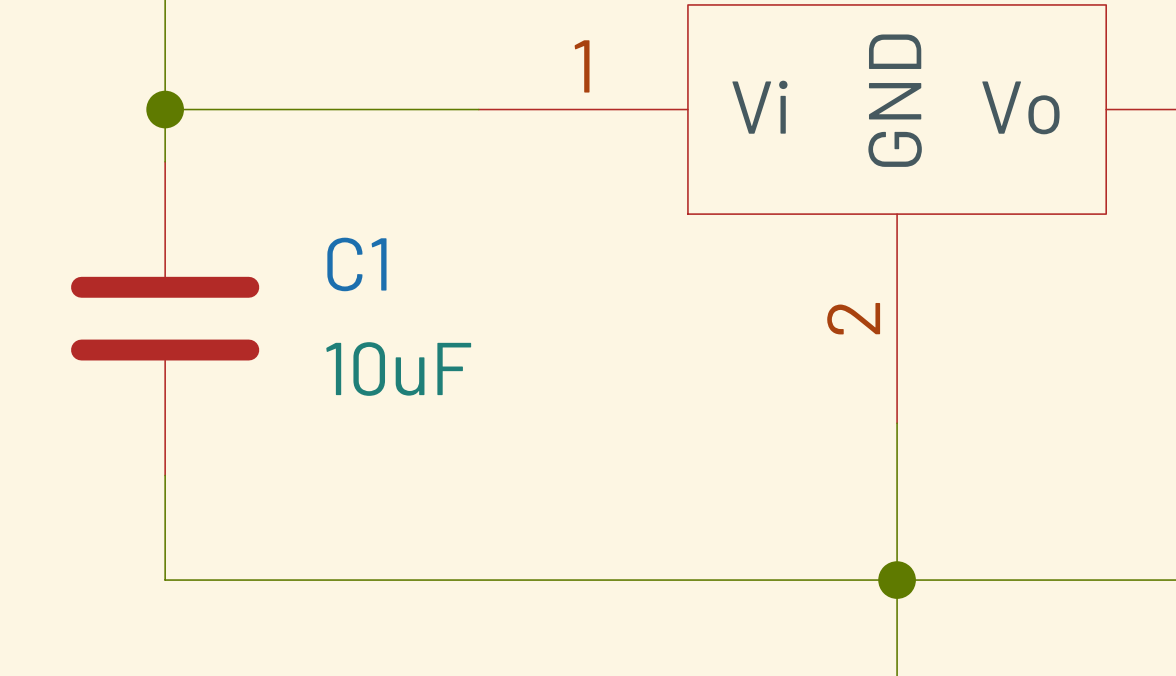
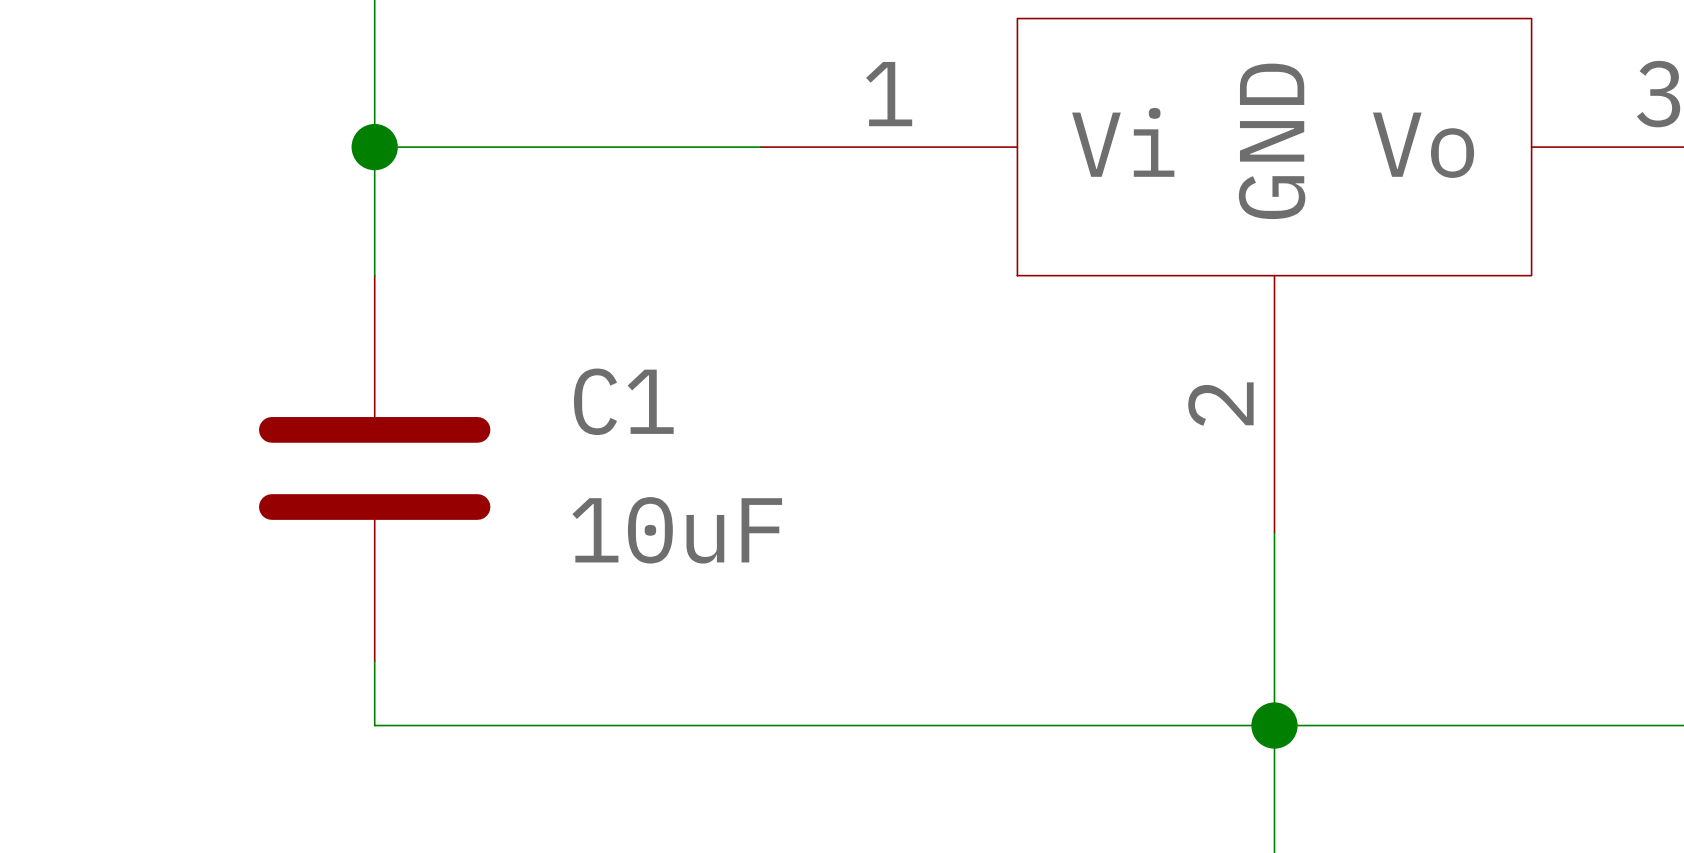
C1 position: (165, 318) -> (374, 468)

